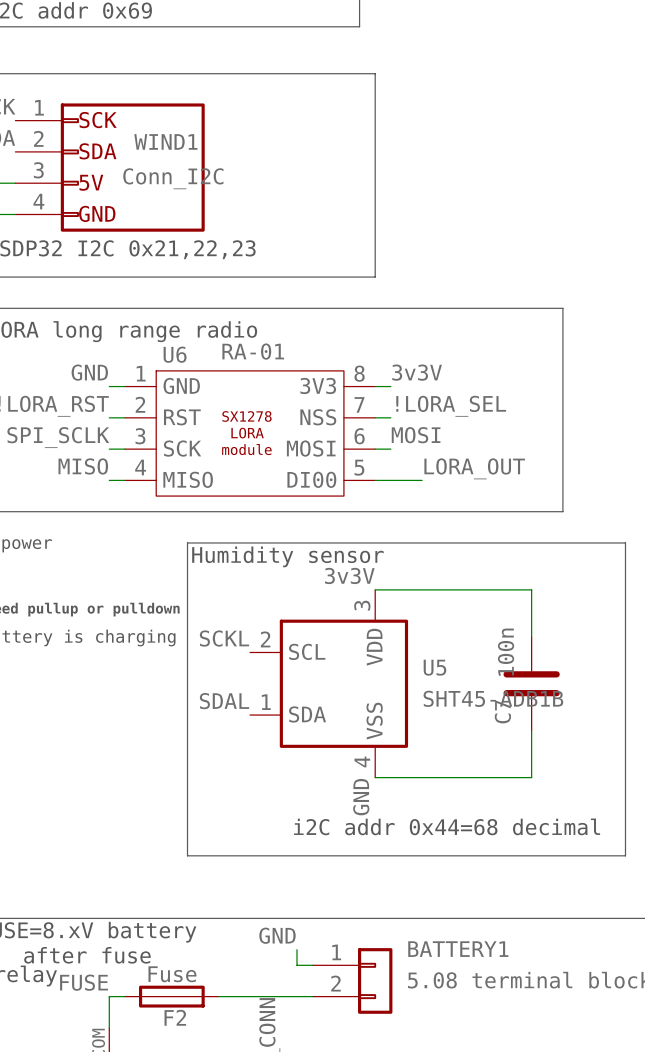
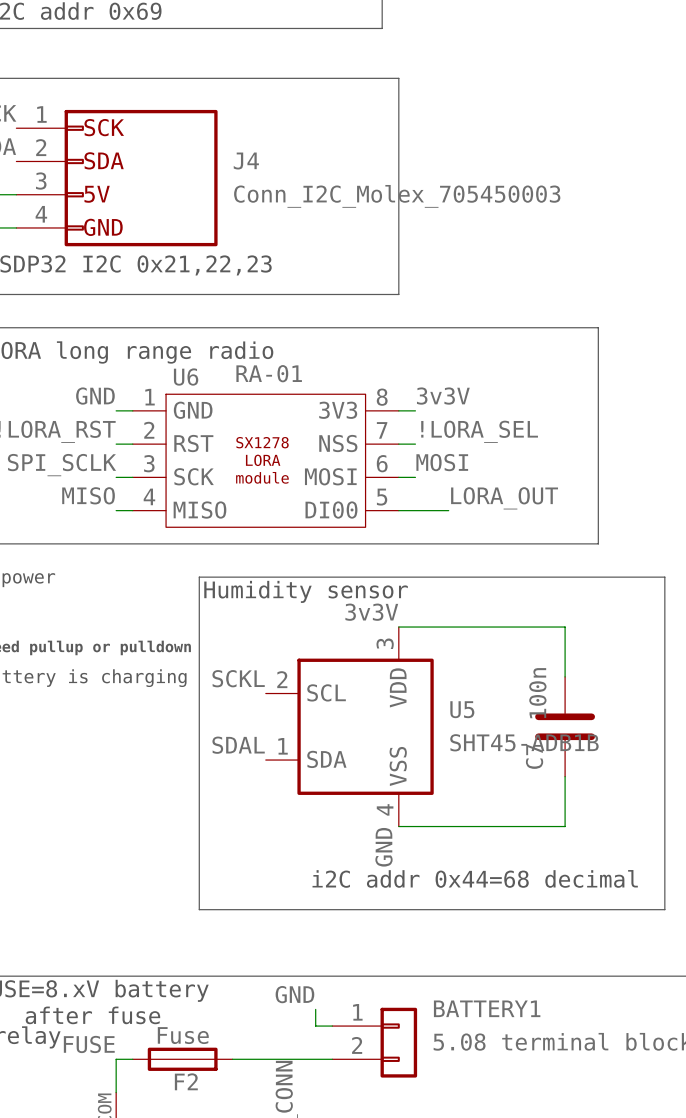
WIND1 name: WIND1 (165, 141) -> J4 (246, 161)
WIND1 value: Conn_I2C (173, 178) -> Conn_I2C_Molex_705450003 (397, 196)

